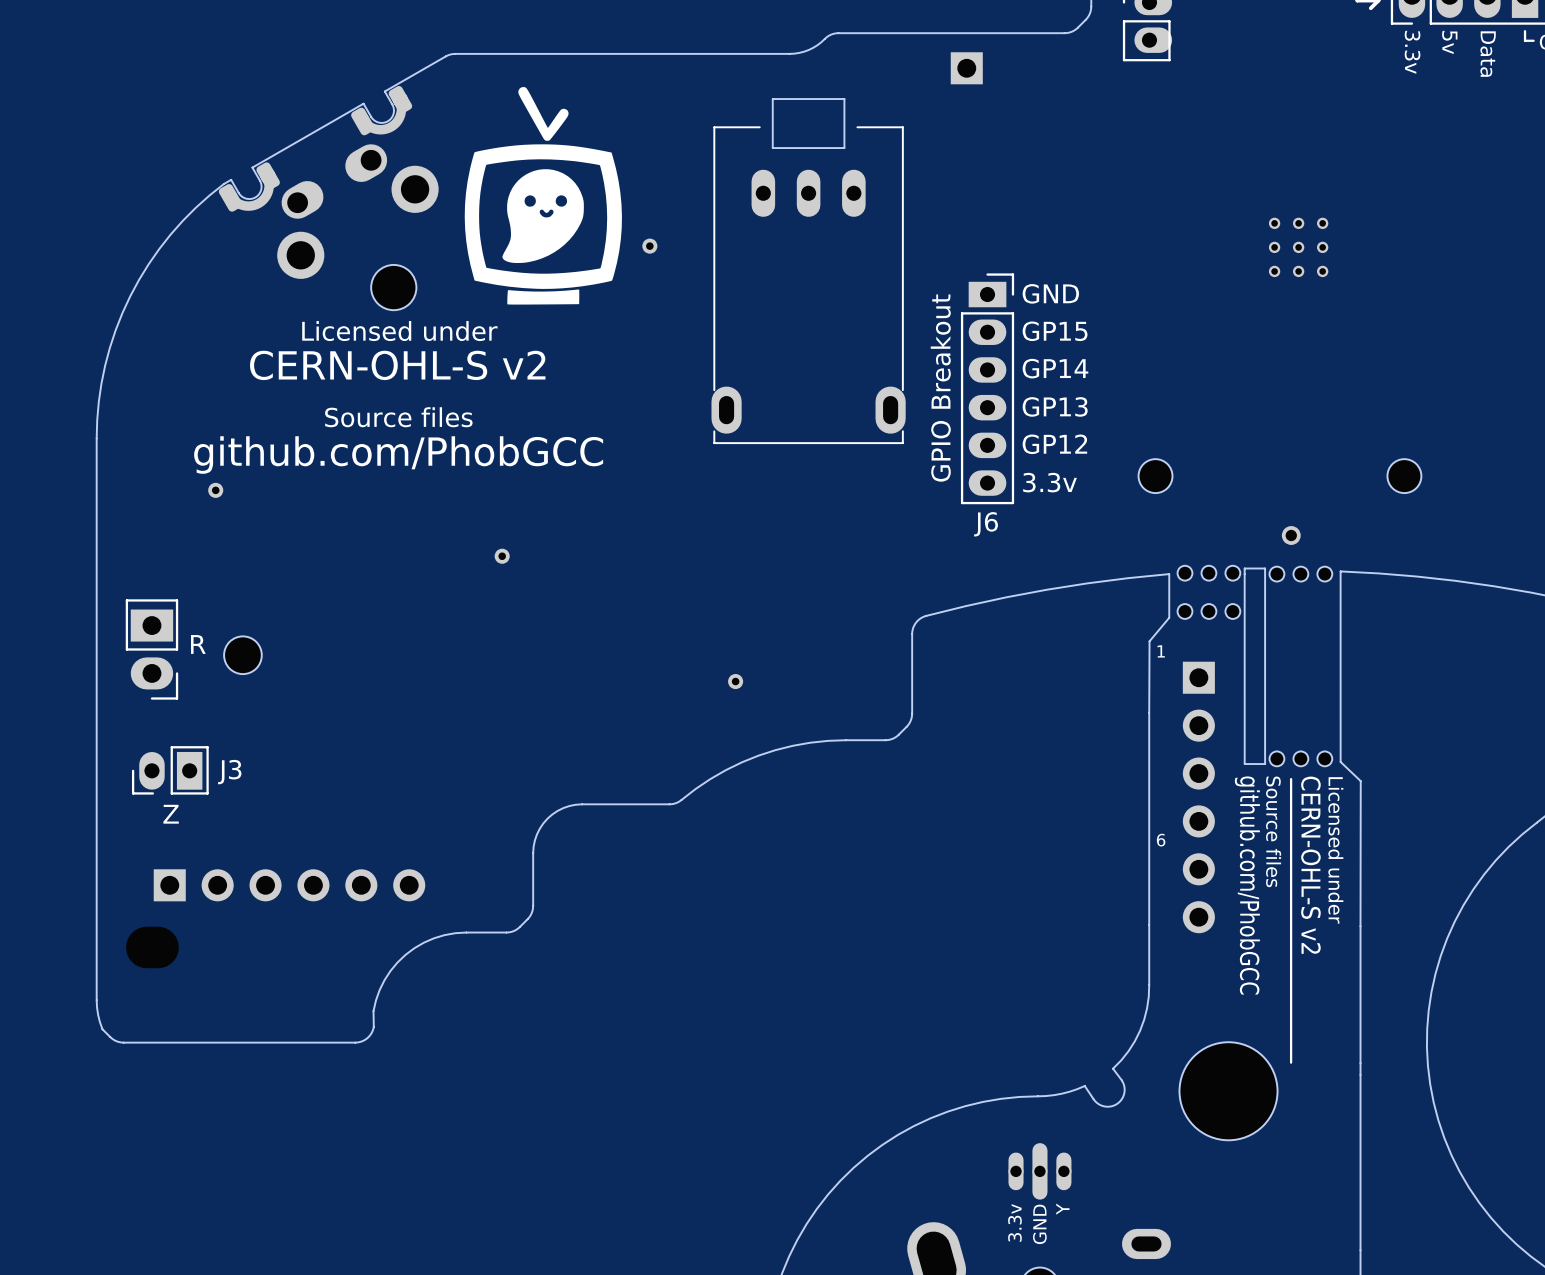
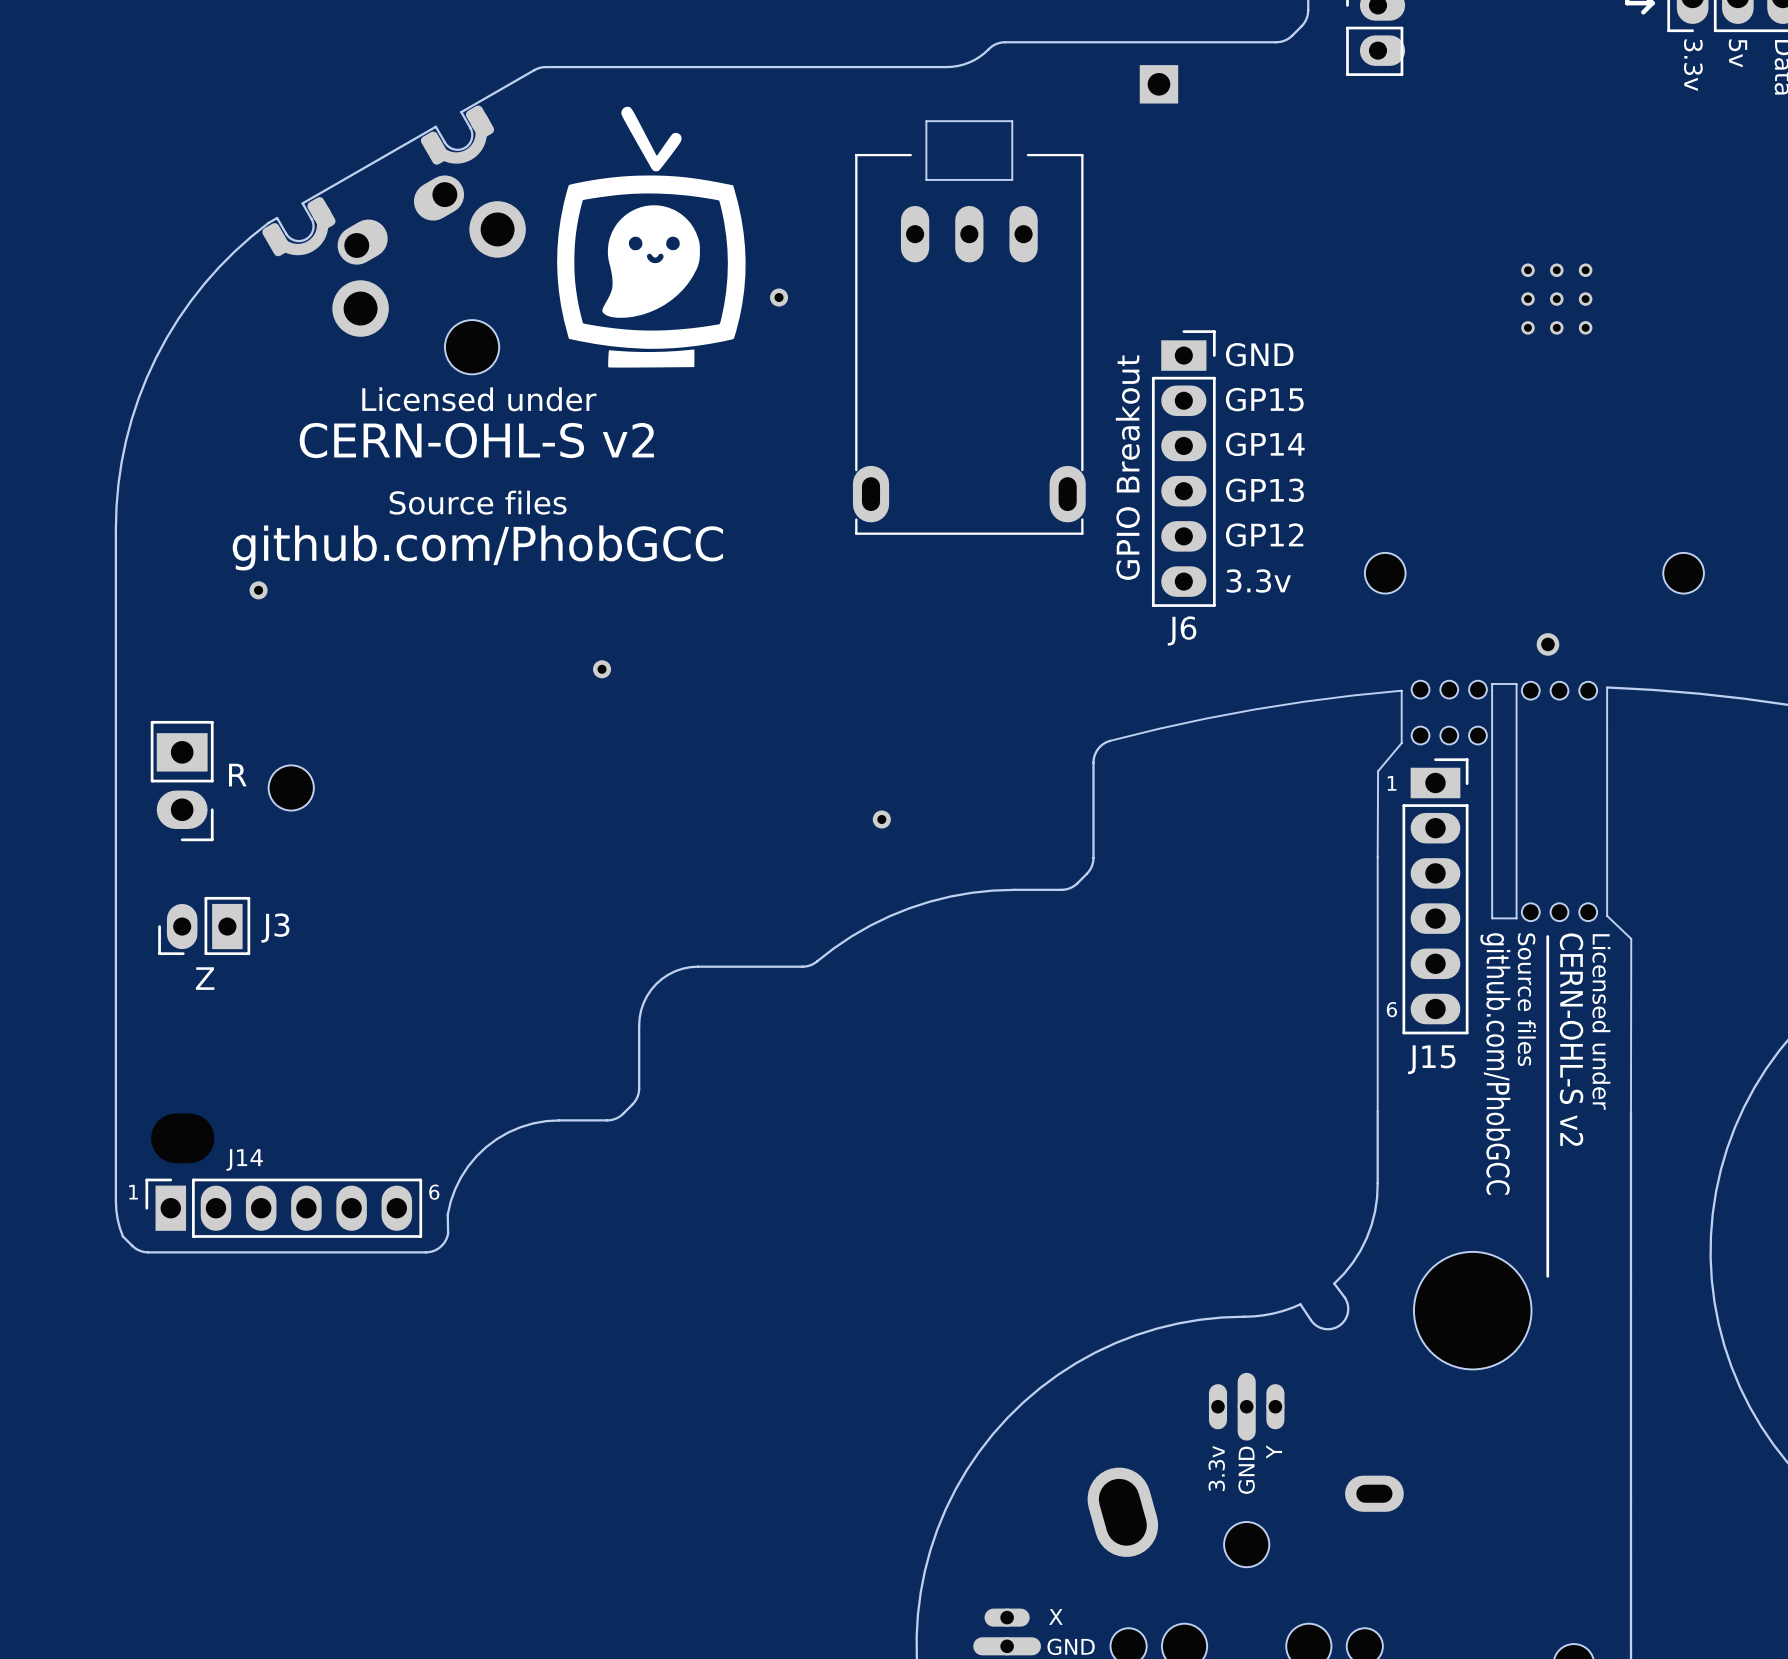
J15: none -> (1435, 896)
part: (1198, 797) -> none
part: (289, 885) -> none
text: none -> 1 (133, 1192)
text: none -> 6 (434, 1192)
J14: none -> (283, 1208)

